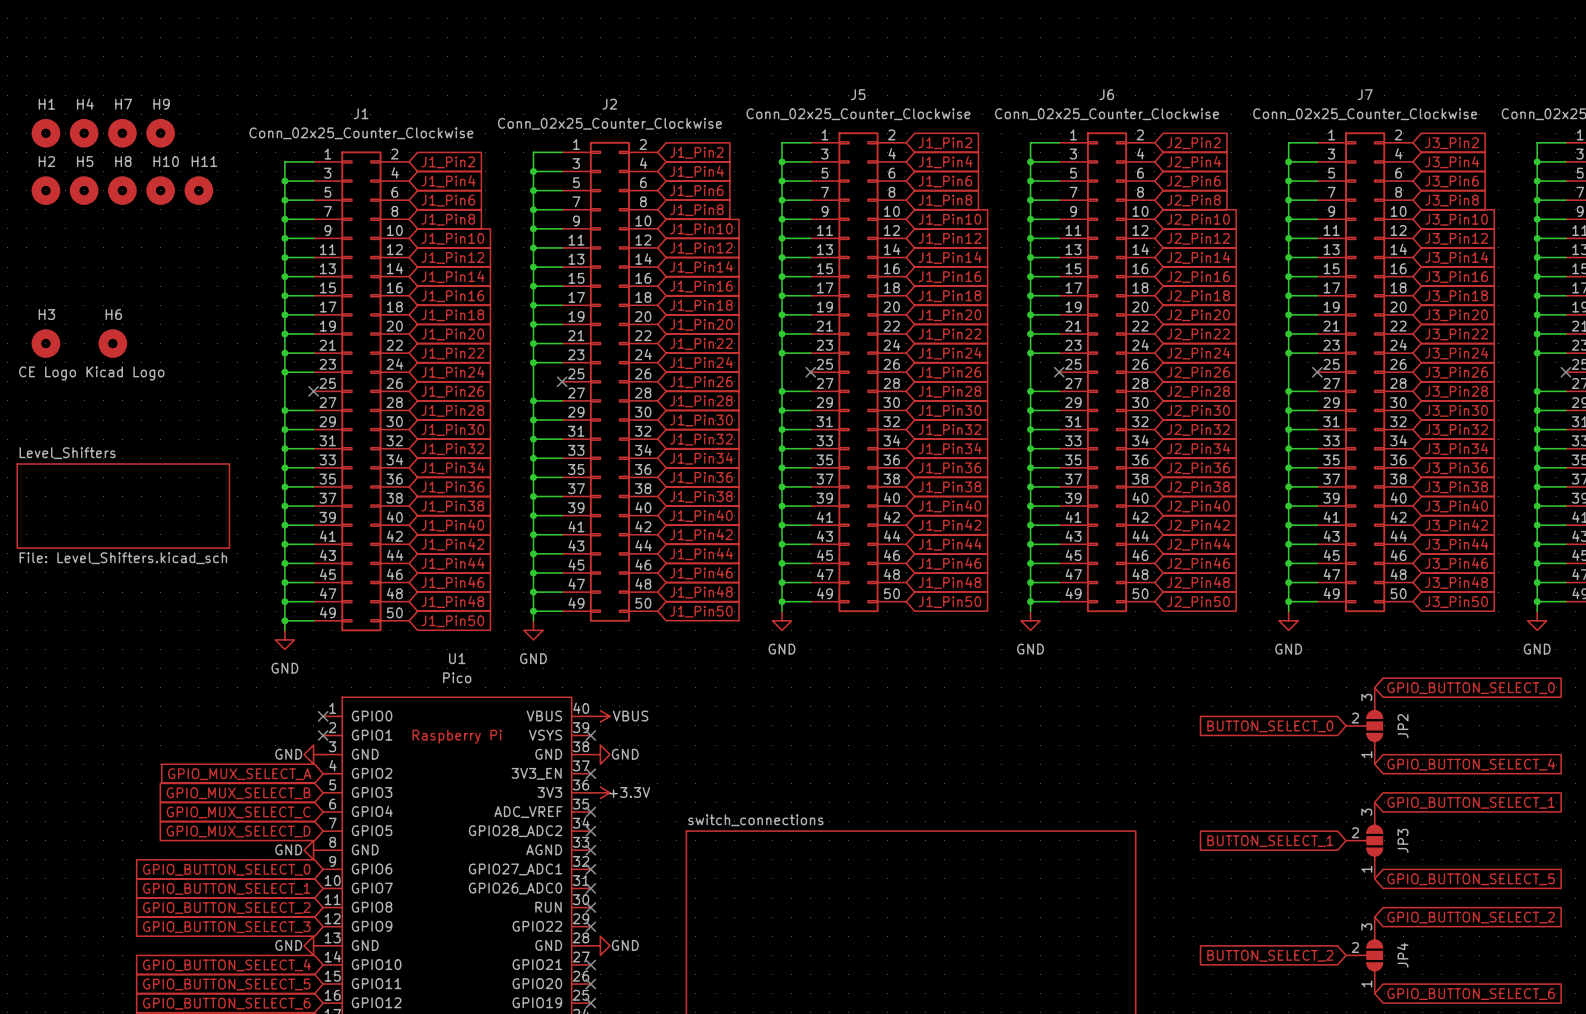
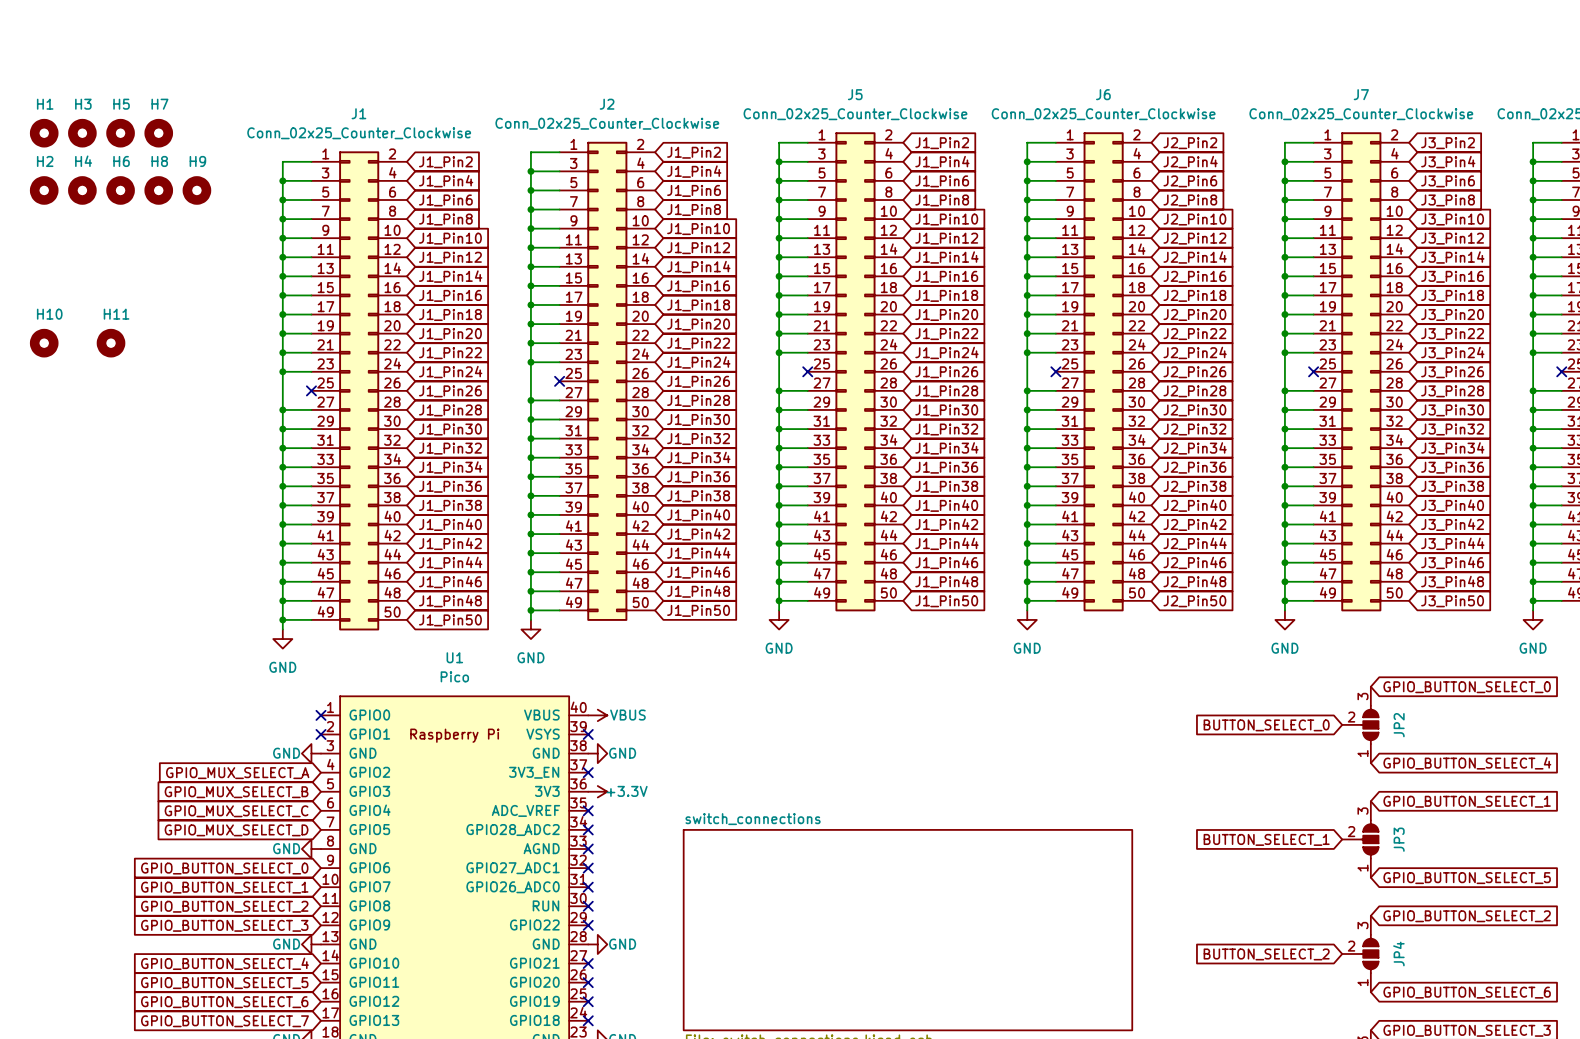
H4 name: H4 (85, 103) -> H3 (83, 104)
H7 name: H7 (123, 104) -> H5 (121, 104)
H9 name: H9 (161, 104) -> H7 (159, 104)
H5 name: H5 (85, 161) -> H4 (83, 161)
H8 name: H8 (123, 161) -> H6 (121, 161)
H10 name: H10 (166, 161) -> H8 (159, 161)
H11 name: H11 (204, 161) -> H9 (197, 161)
H3 name: H3 (46, 314) -> H10 (49, 314)
H6 name: H6 (113, 314) -> H11 (116, 314)
H3 value: CE Logo (47, 373) -> none
H6 value: Kicad Logo (125, 373) -> none
sheet Level_Shifters: File: Level_Shifters.kicad_sch (123, 506) -> none

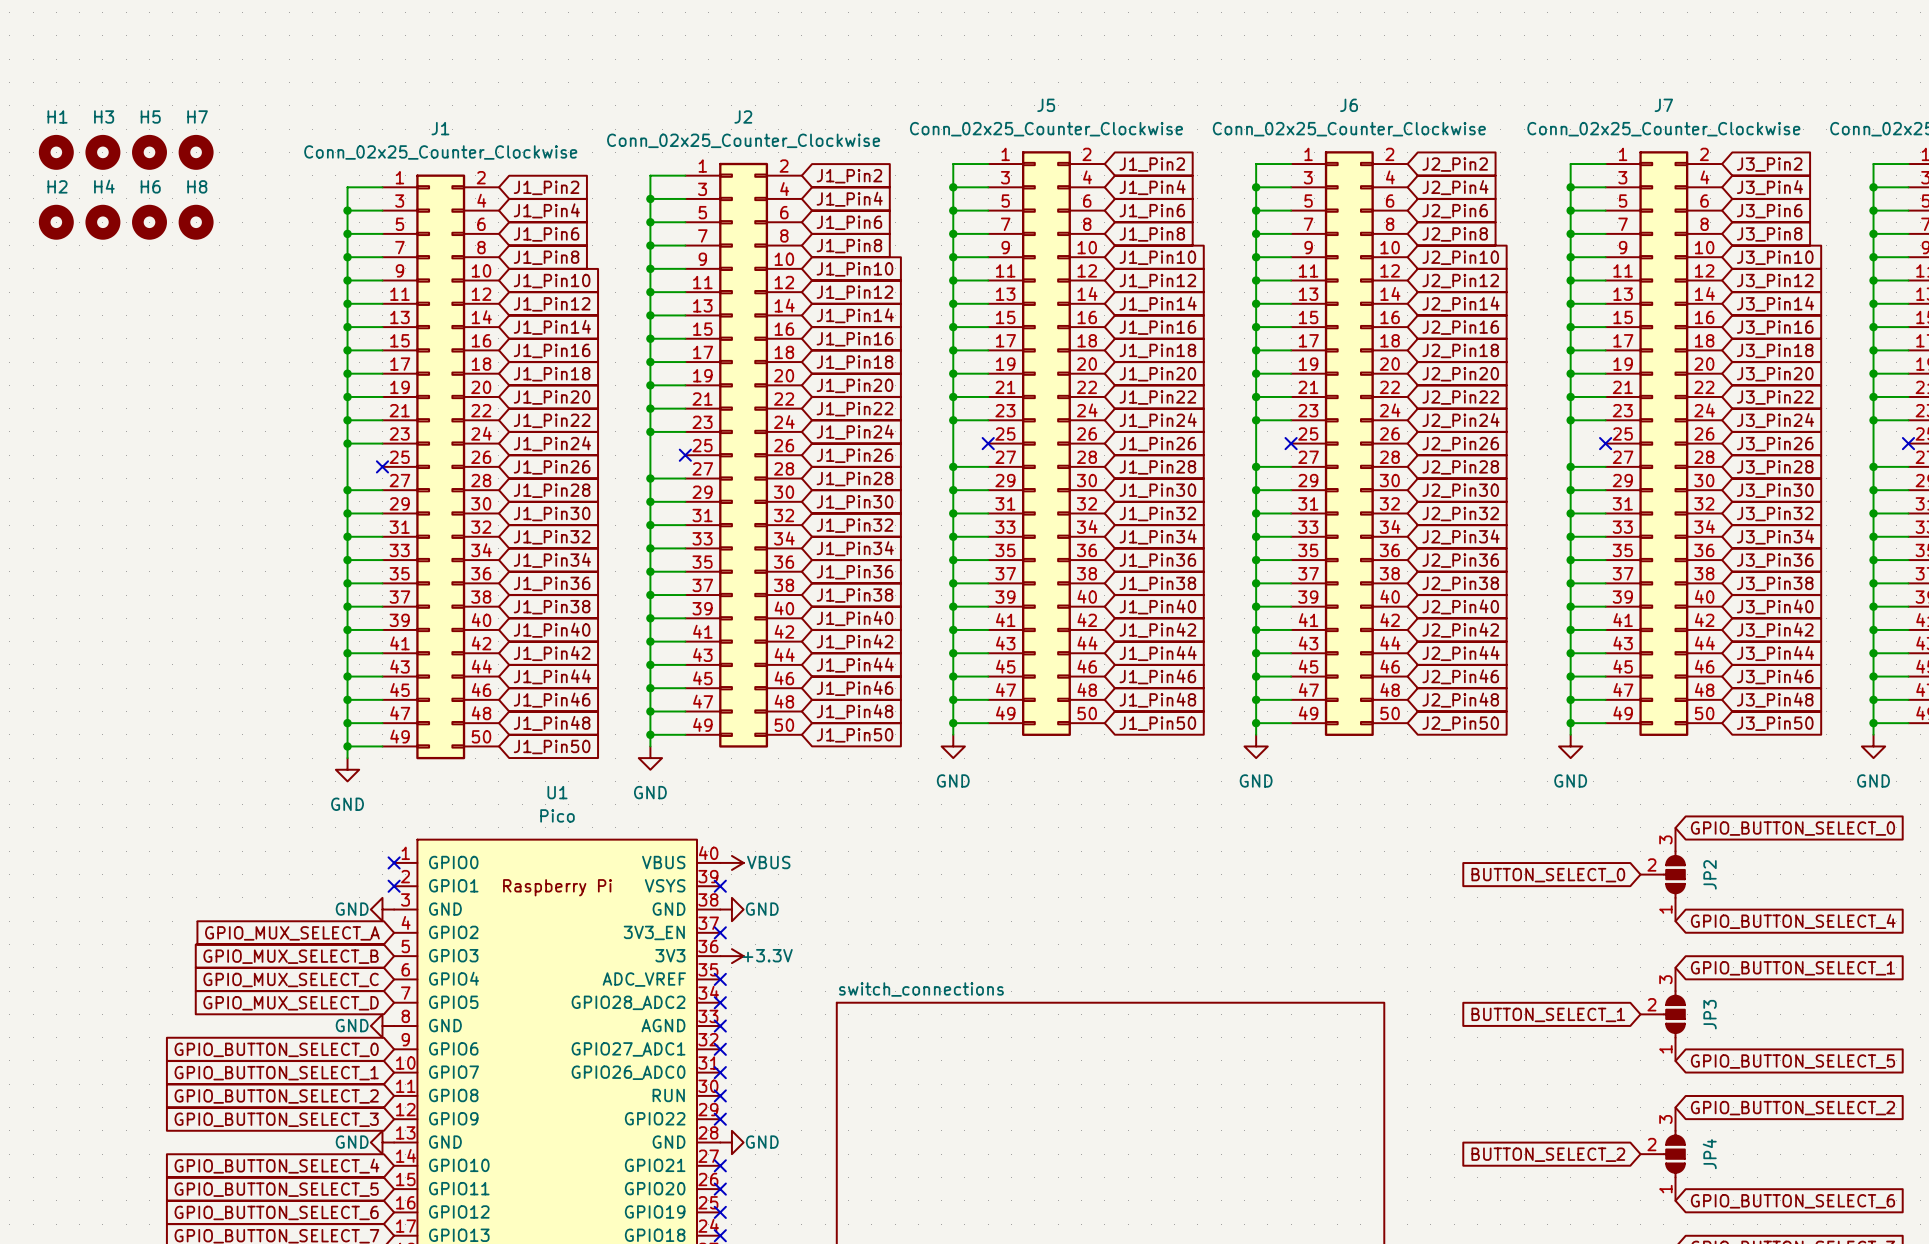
H9: (196, 190) -> none
H10: (44, 343) -> none
H11: (111, 343) -> none

